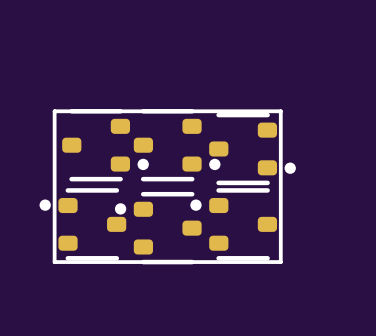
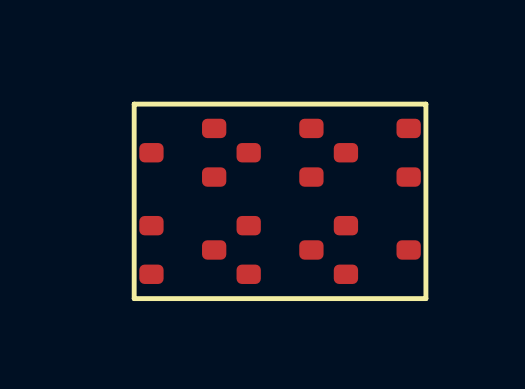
part footprint: [62, 109, 149, 182] -> [139, 118, 227, 187]
part footprint: [133, 109, 221, 182] -> [236, 118, 324, 187]
part footprint: [209, 112, 296, 186] -> [333, 118, 421, 187]
part footprint: [39, 188, 127, 261] -> [139, 215, 227, 284]
part footprint: [190, 188, 278, 261] -> [333, 215, 421, 284]
part footprint: [114, 191, 202, 265] -> [236, 215, 324, 284]

